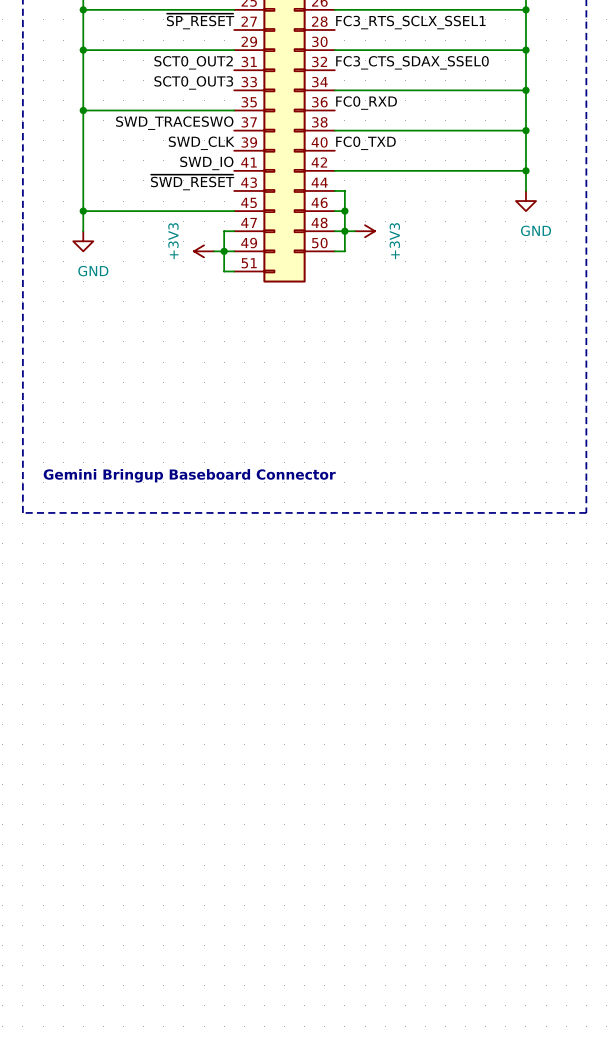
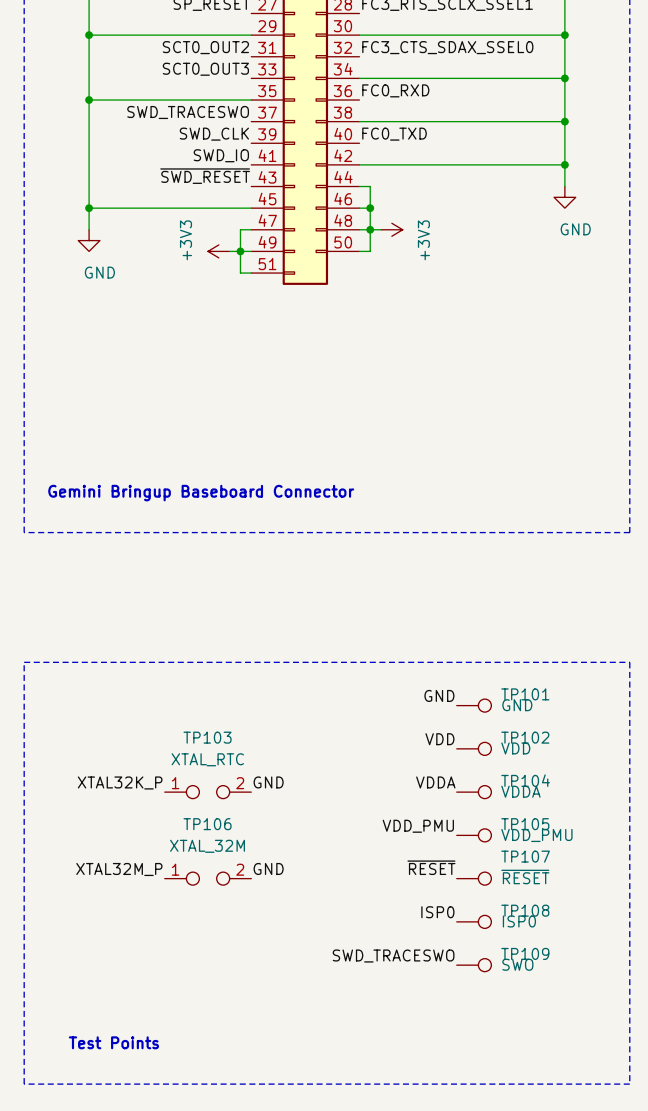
line: none -> (24, 662) (24, 1084) (629, 1084) (629, 662) (24, 662)
label: none -> GND (439, 695)
TP101: none -> GND (474, 705)
label: none -> VDD (439, 739)
TP102: none -> VDD (474, 748)
label: none -> GND (268, 782)
label: none -> VDDA (435, 782)
label: none -> XTAL32K_P (120, 782)
TP103: none -> XTAL_RTC (208, 792)
TP104: none -> VDDA (474, 792)
label: none -> VDD_PMU (418, 826)
TP105: none -> VDD_PMU (474, 835)
label: none -> ~{RESET} (431, 867)
label: none -> GND (268, 868)
label: none -> XTAL32M_P (119, 869)
TP106: none -> XTAL_32M (208, 878)
TP107: none -> ~{RESET} (474, 878)
label: none -> ISP0 (437, 912)
TP108: none -> ISP0 (474, 921)
label: none -> SWD_TRACESWO (393, 956)
TP109: none -> SWO (474, 965)
text: none -> Test Points (113, 1042)

